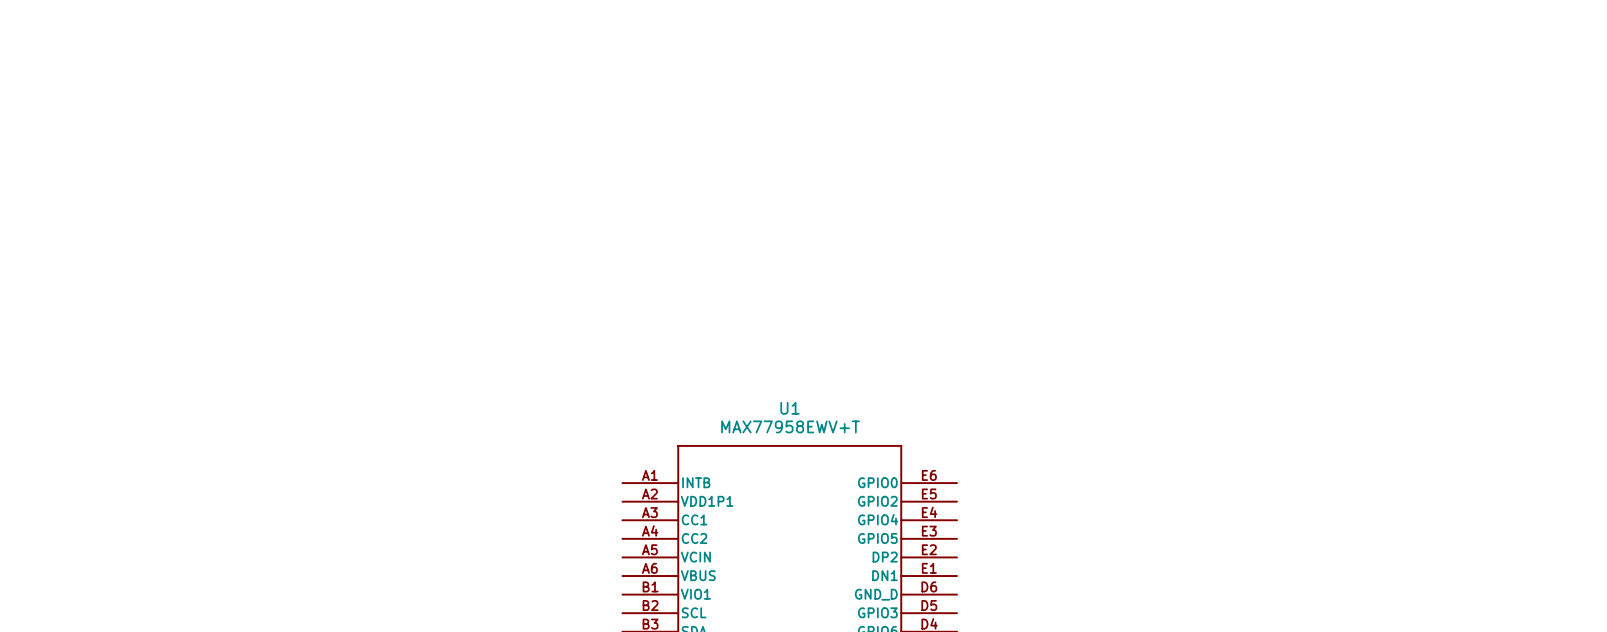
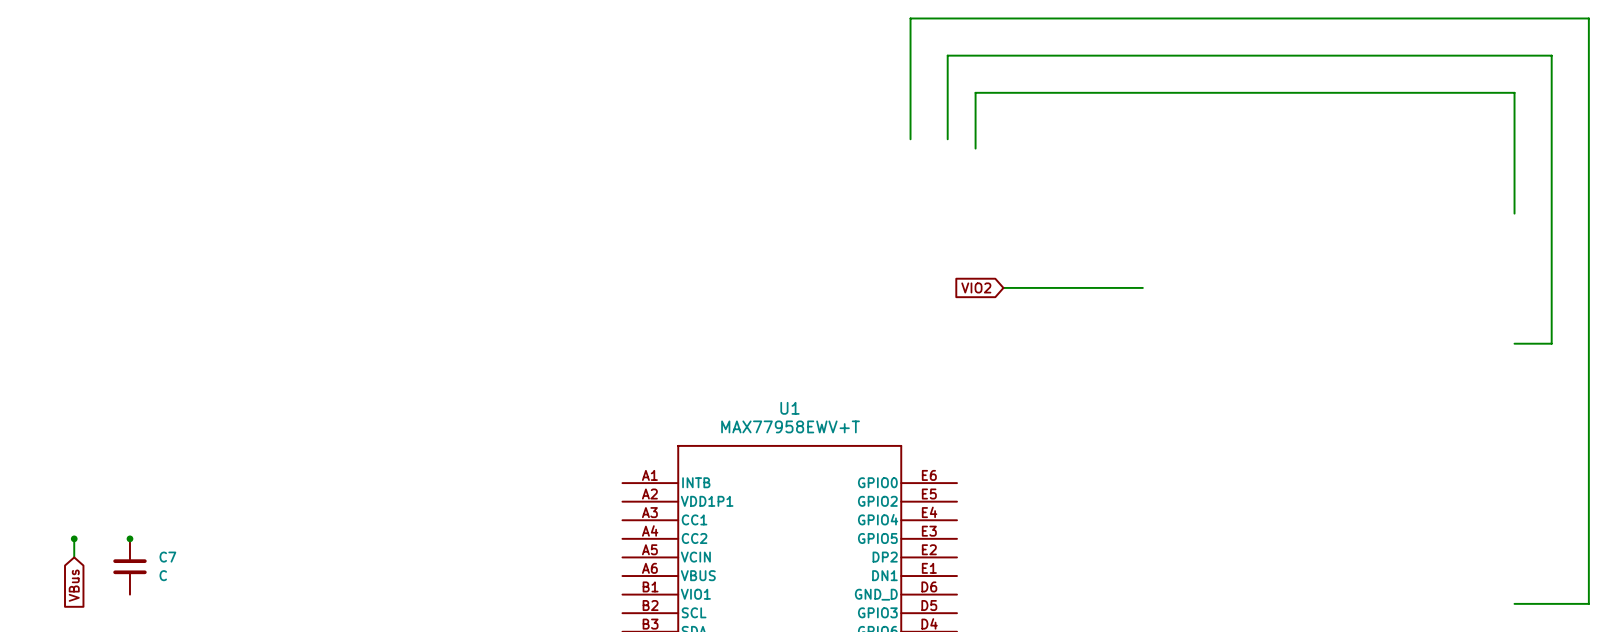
wire: none -> (910, 139) (910, 18) (1588, 18) (1588, 603) (1514, 603)
wire: none -> (947, 139) (947, 55) (1551, 55) (1551, 343) (1514, 343)
wire: none -> (975, 148) (975, 92) (1514, 92) (1514, 213)
global label: none -> VIO2 (976, 287)
wire: none -> (1003, 287) (1142, 287)
wire: none -> (74, 538) (74, 557)
junction: none -> (74, 538)
junction: none -> (129, 538)
C7: none -> C (129, 566)
global label: none -> VBus (74, 585)

